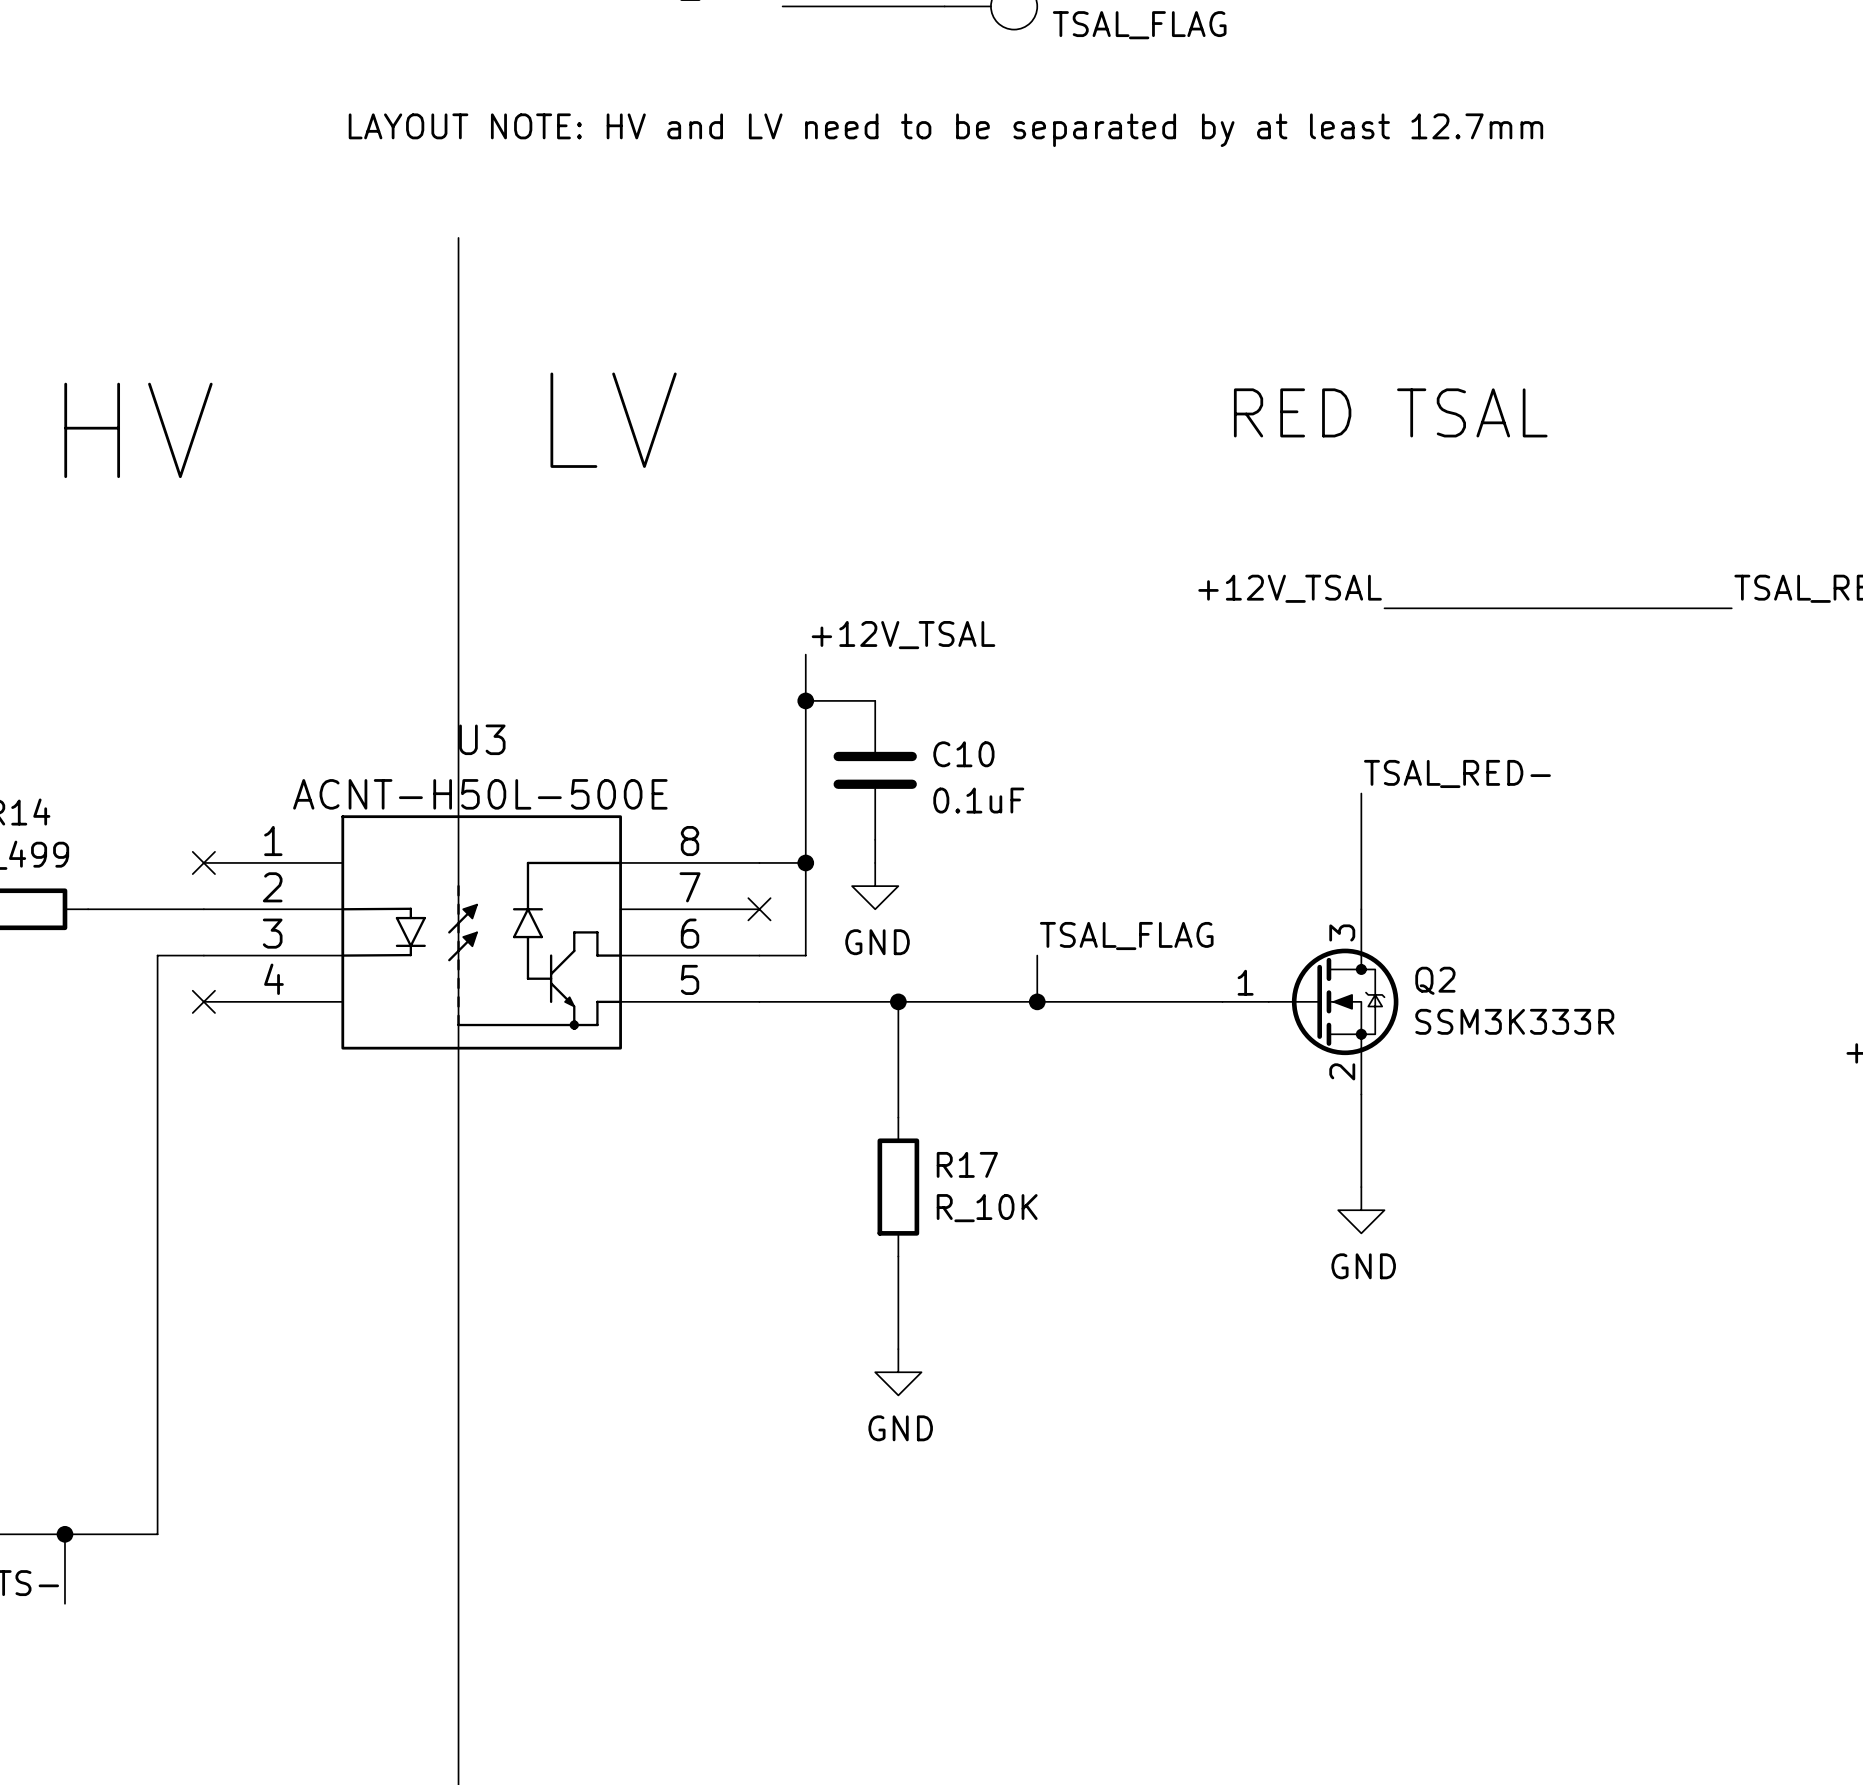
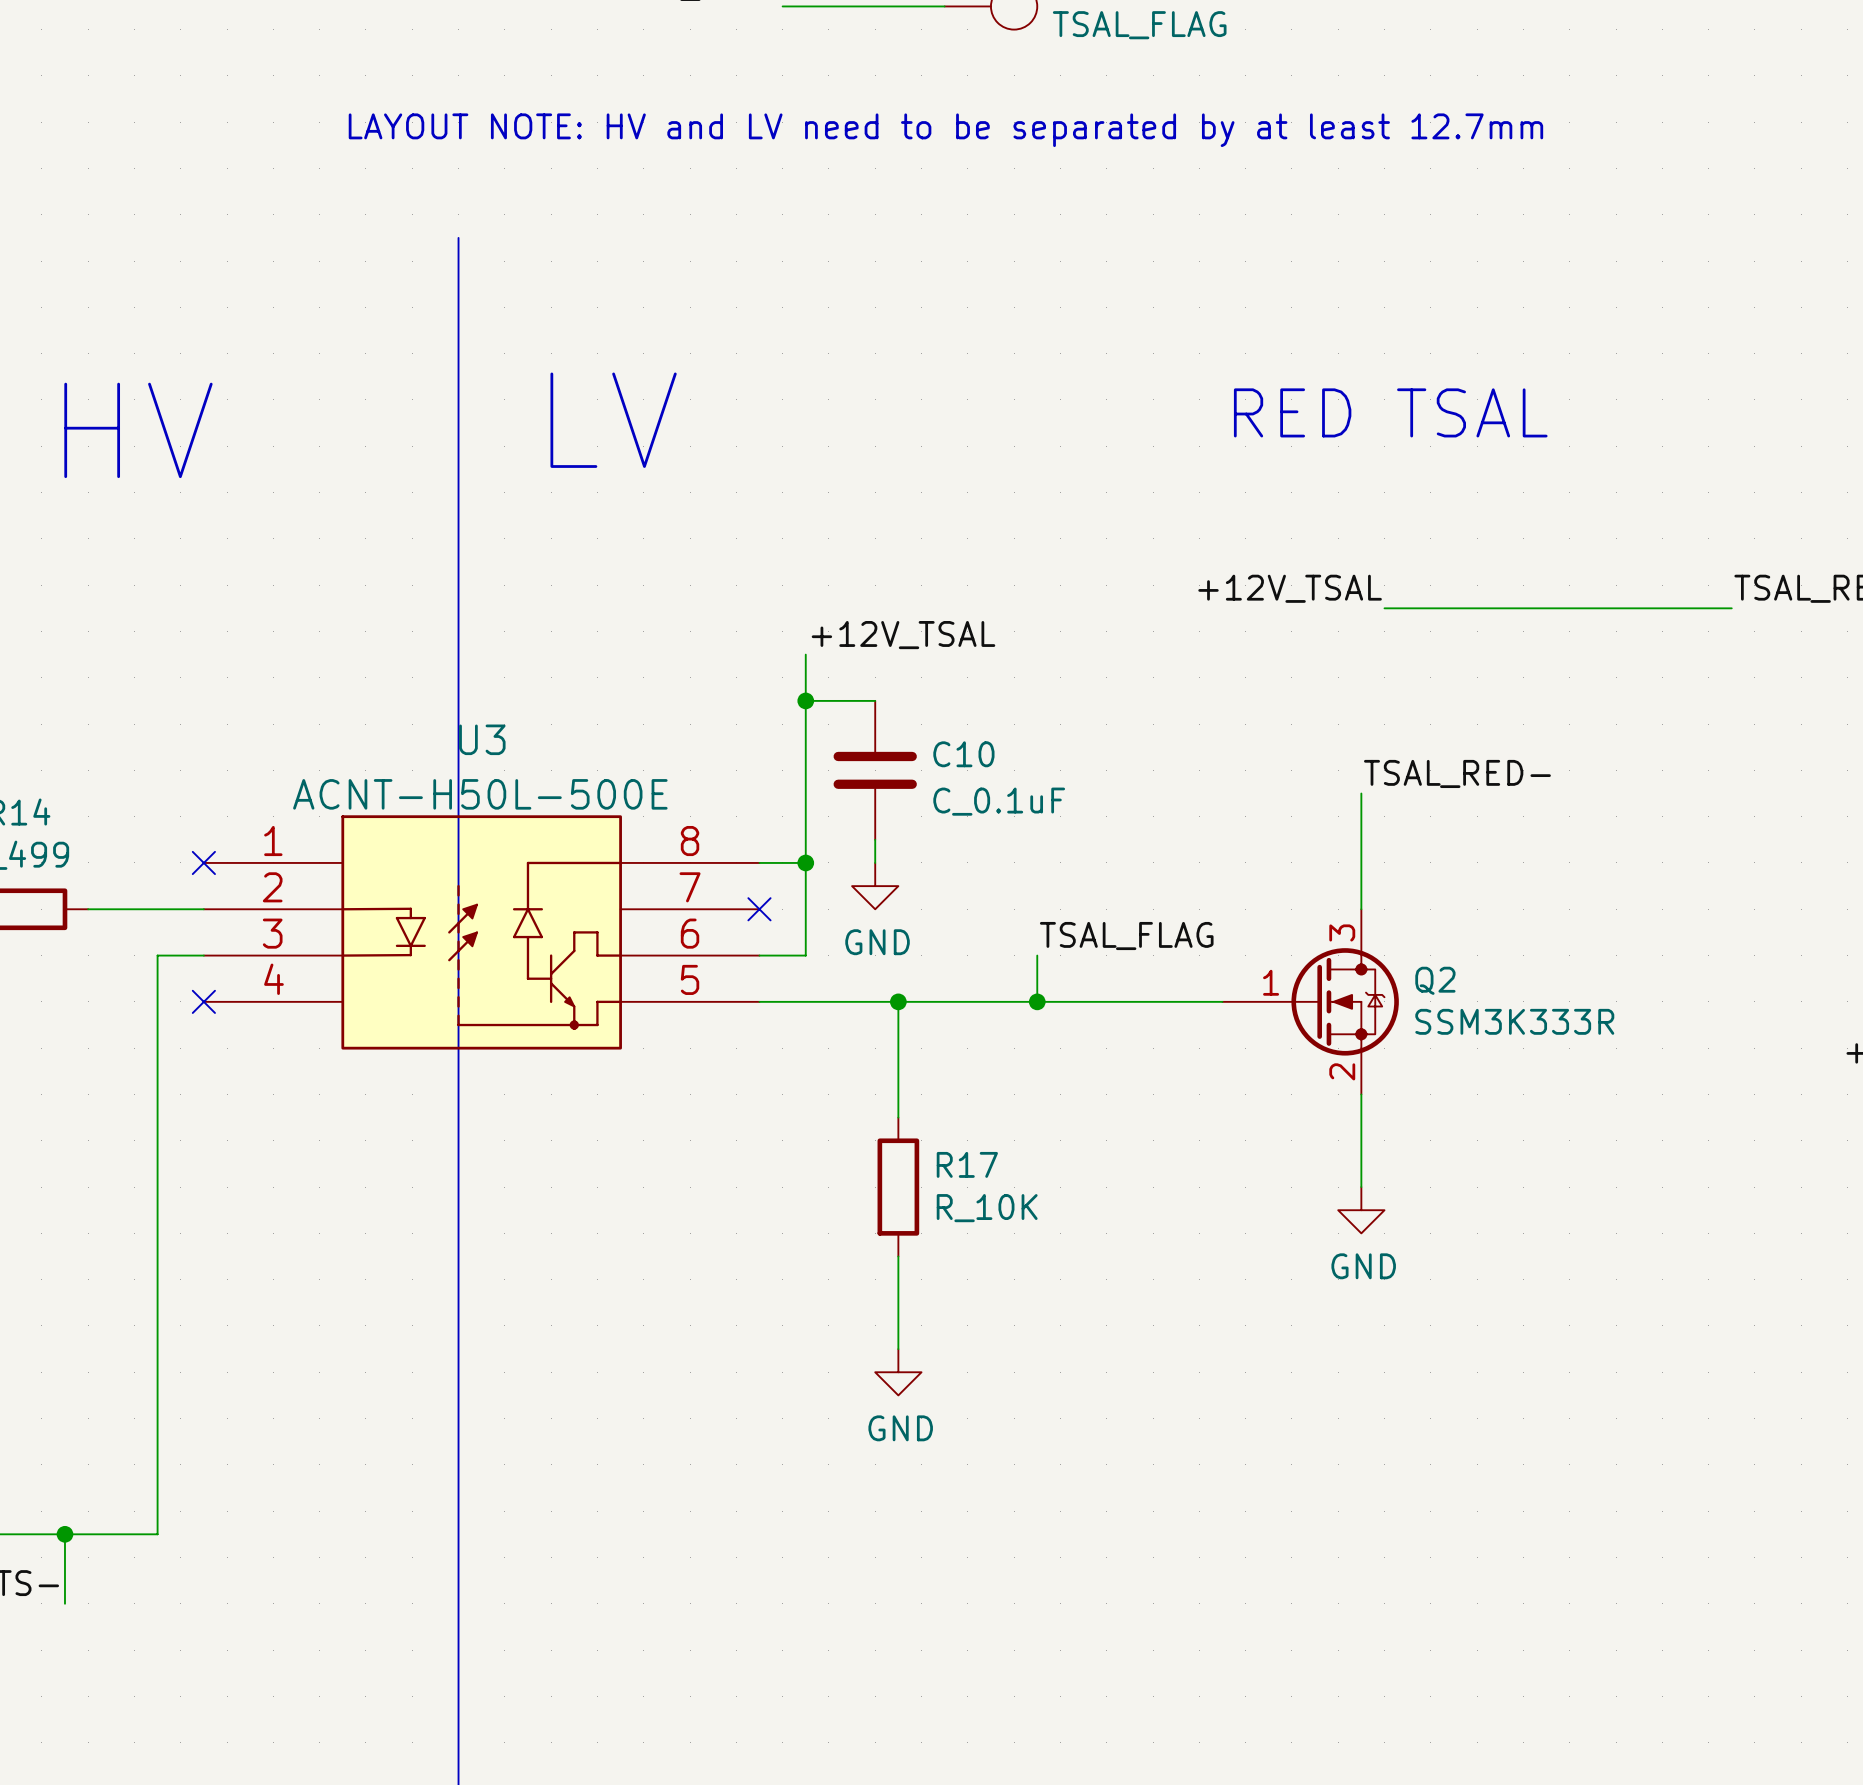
C10 value: 0.1uF (978, 800) -> C_0.1uF (999, 801)
Q2 symbol: [1222, 909, 1399, 1095] -> [1222, 909, 1399, 1095]

